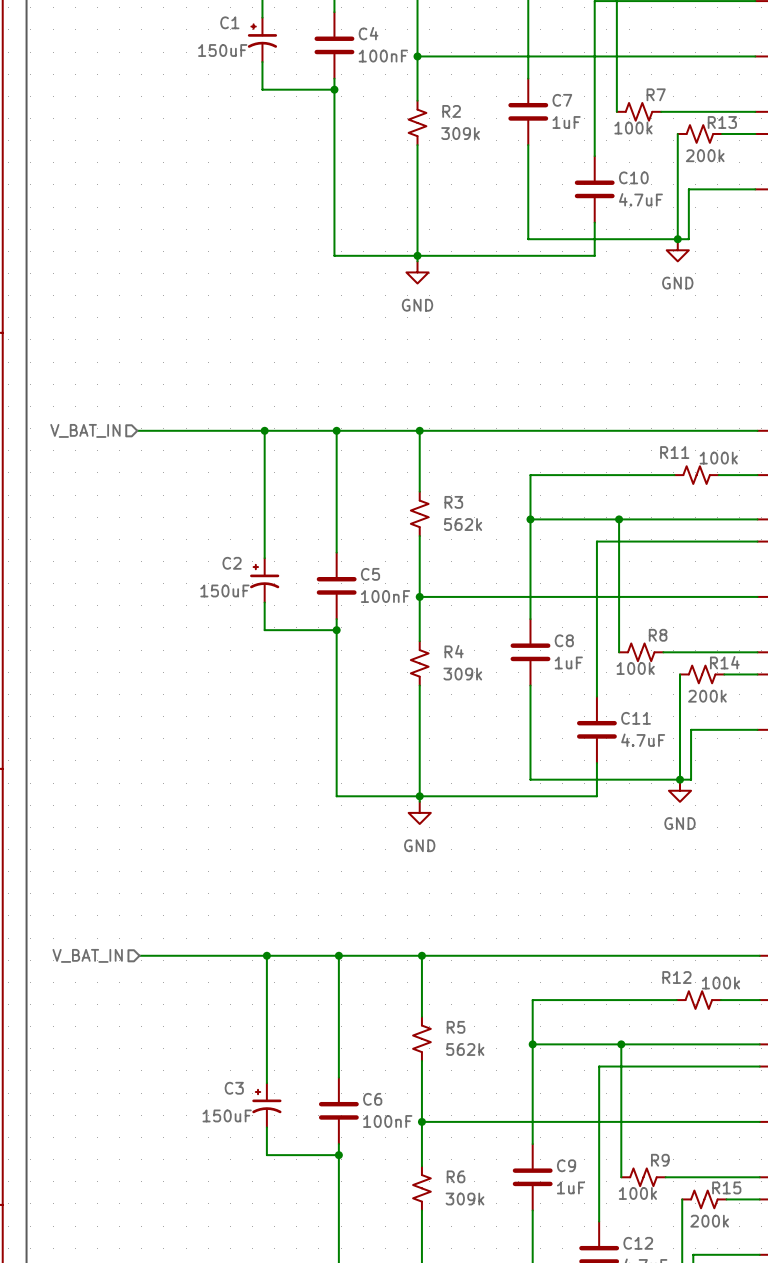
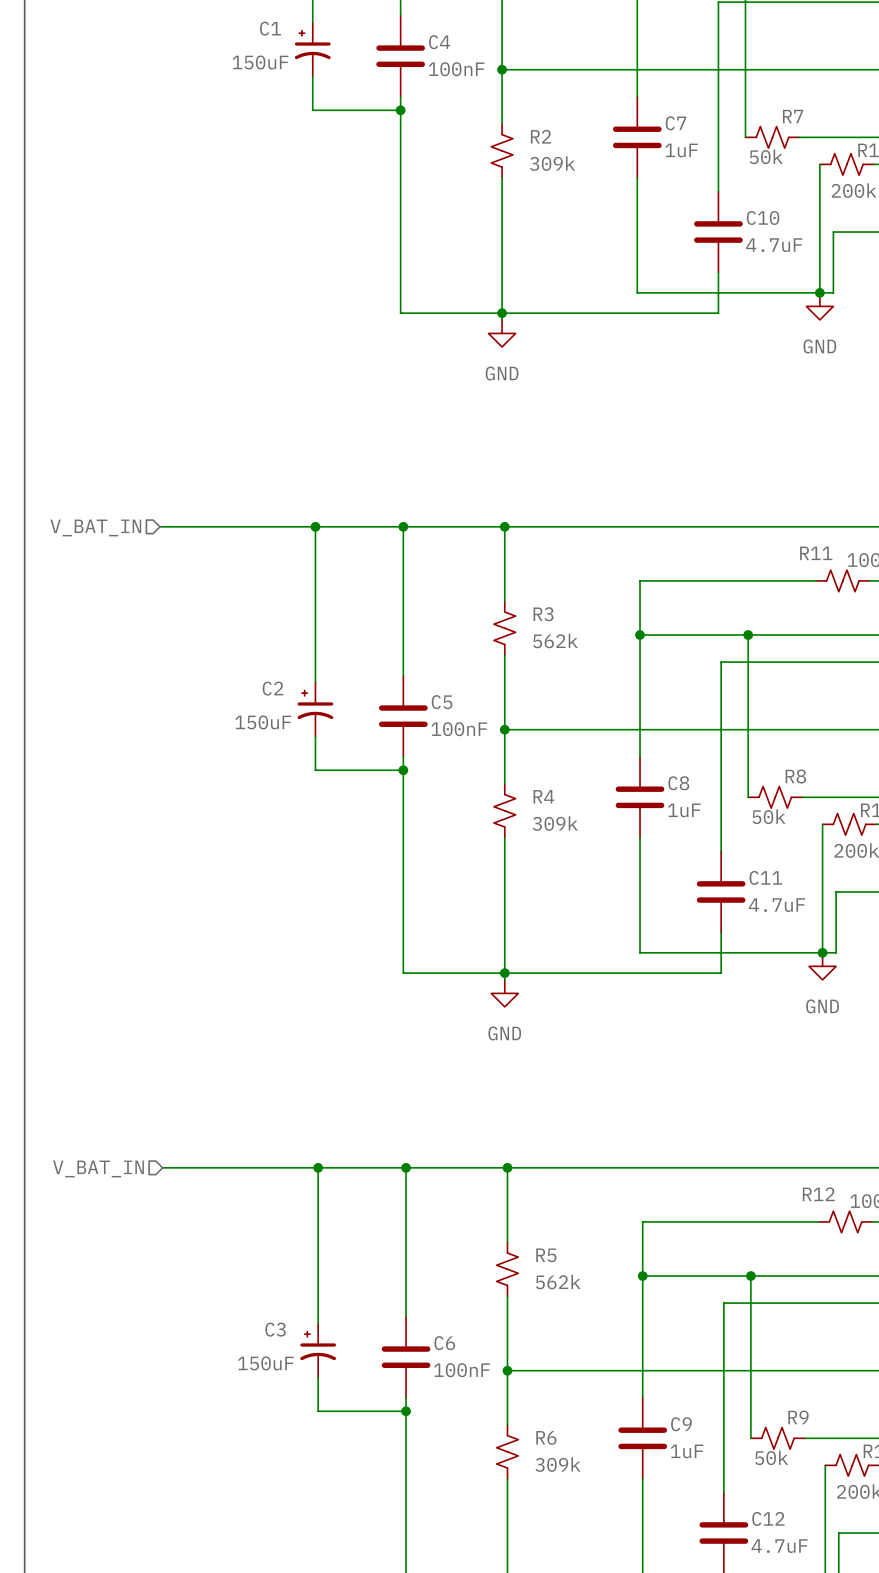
R7 value: 100k (633, 128) -> 50k (766, 156)
R8 value: 100k (635, 668) -> 50k (768, 816)
R9 value: 100k (637, 1193) -> 50k (771, 1457)

